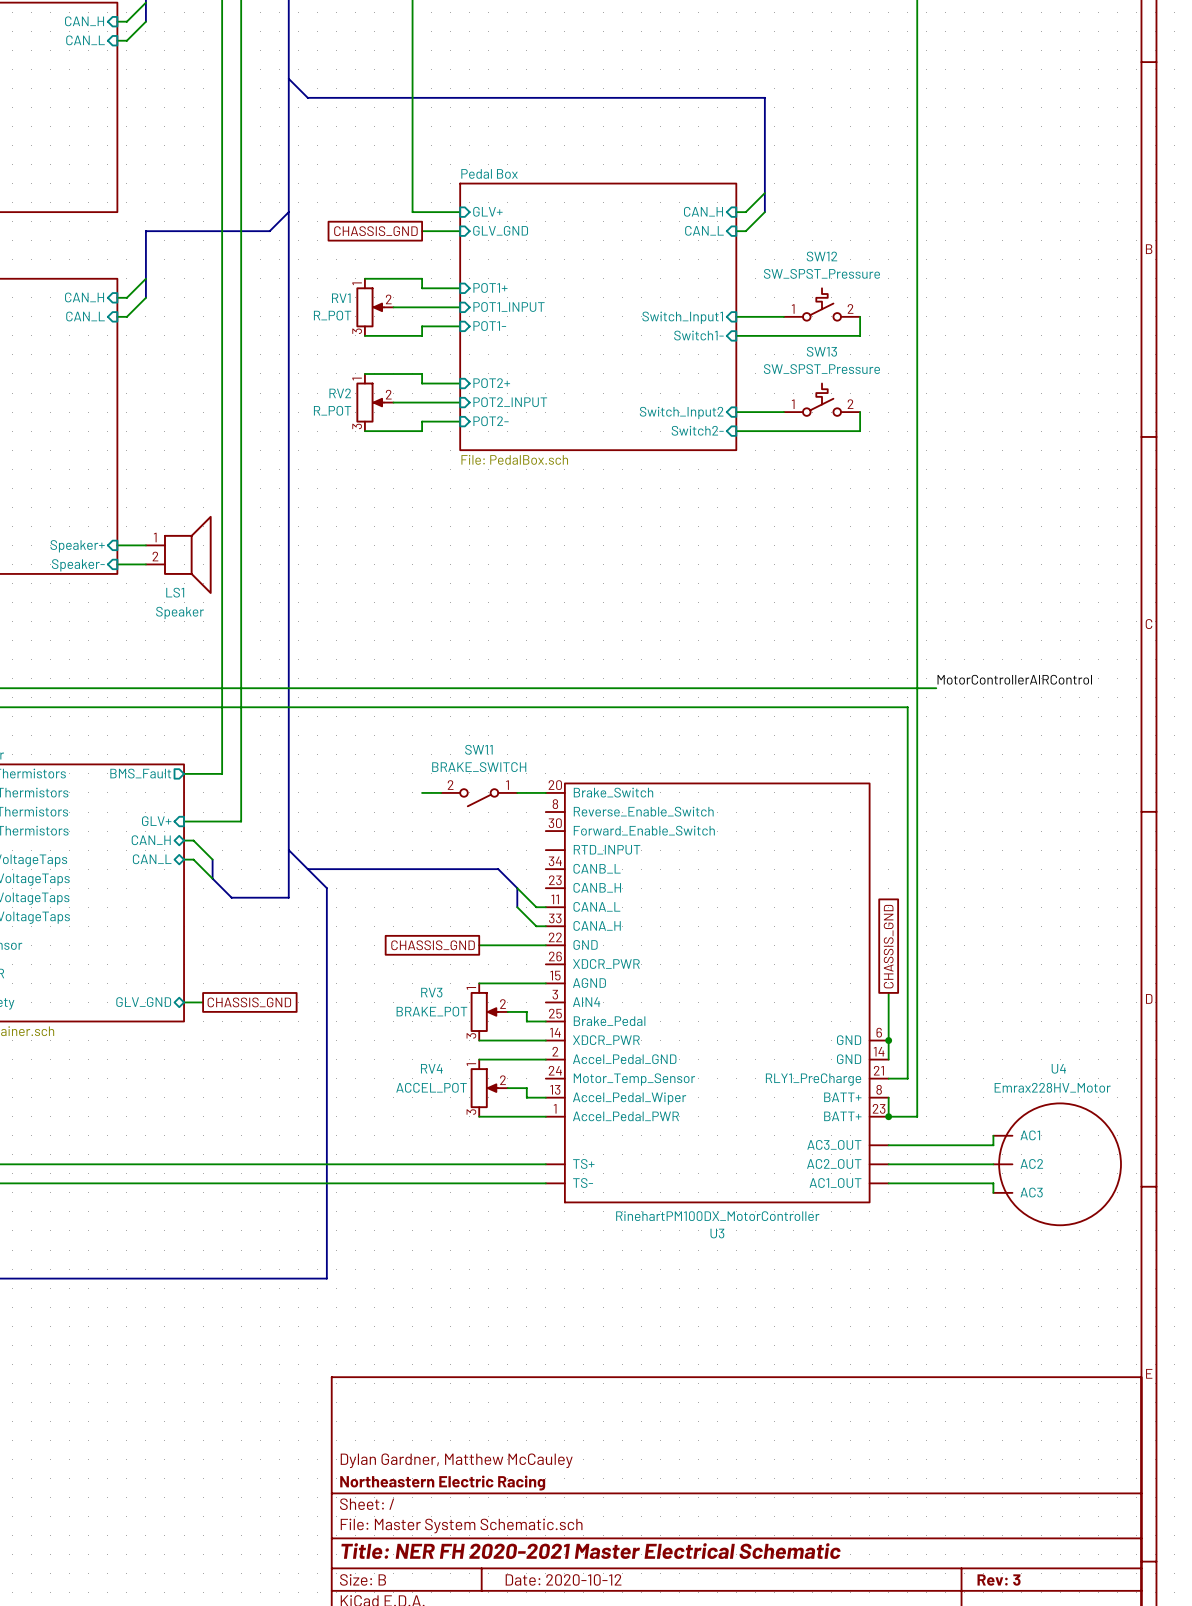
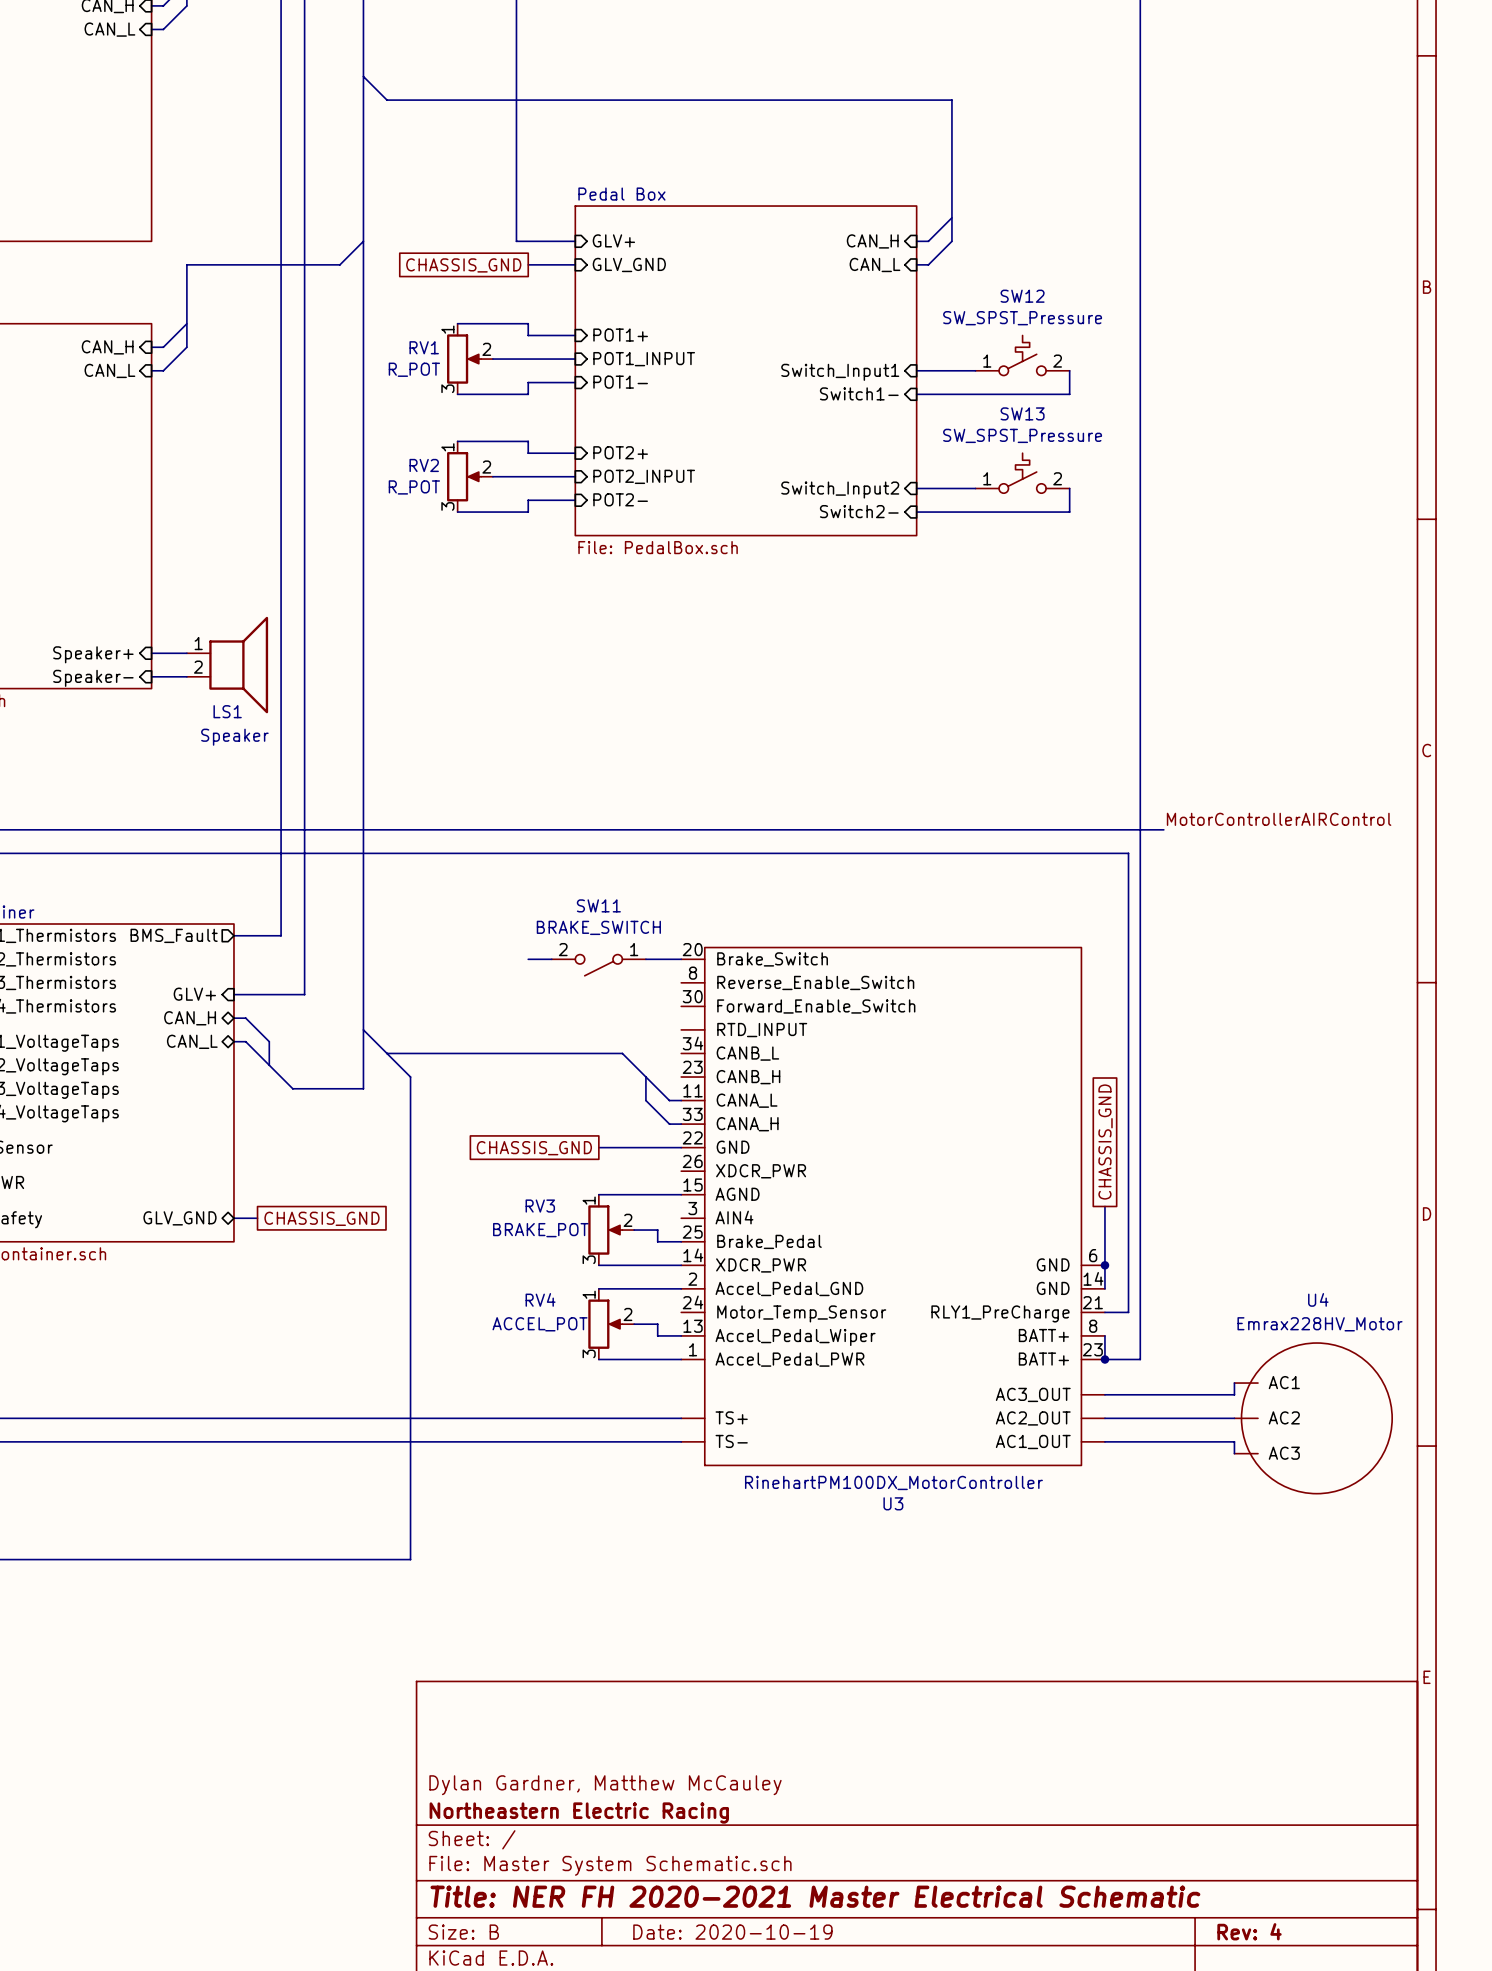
title block: Date: 2020-10-12 (563, 1579) -> Date: 2020-10-19 (732, 1932)
title block: Rev: 3 (999, 1580) -> Rev: 4 (1249, 1931)

